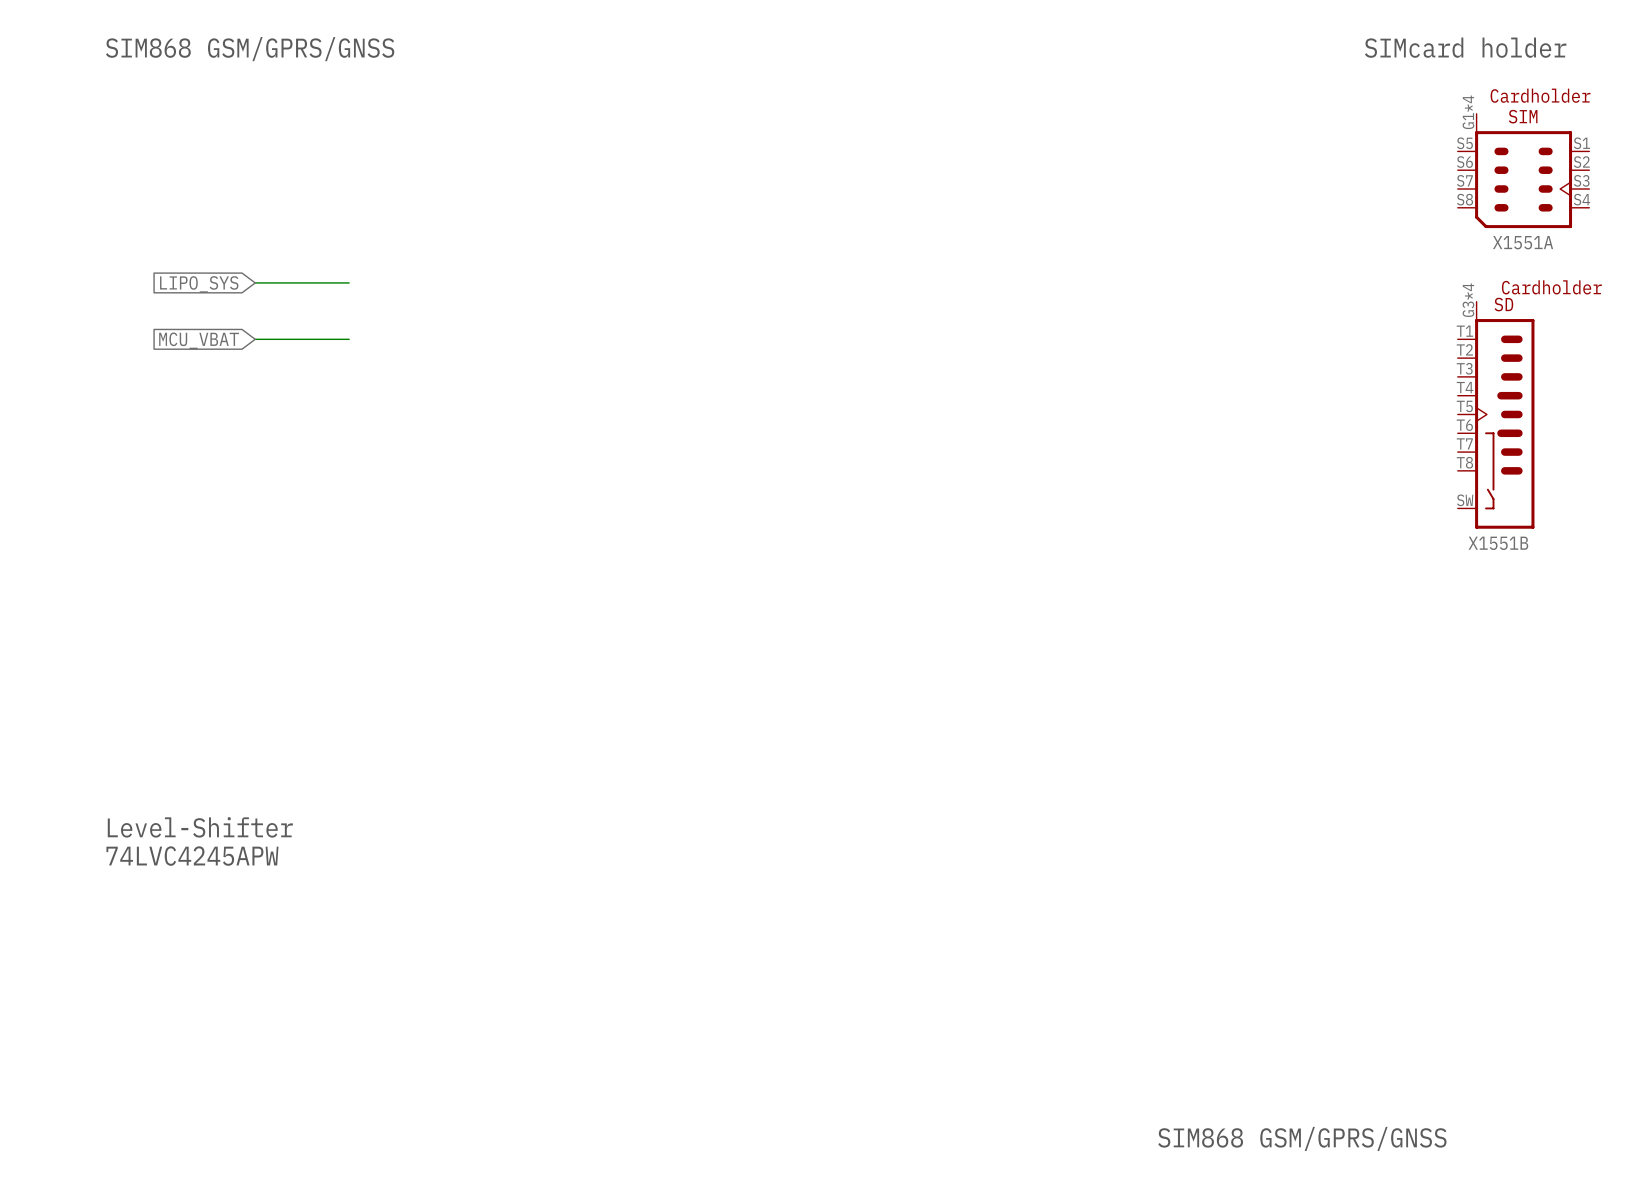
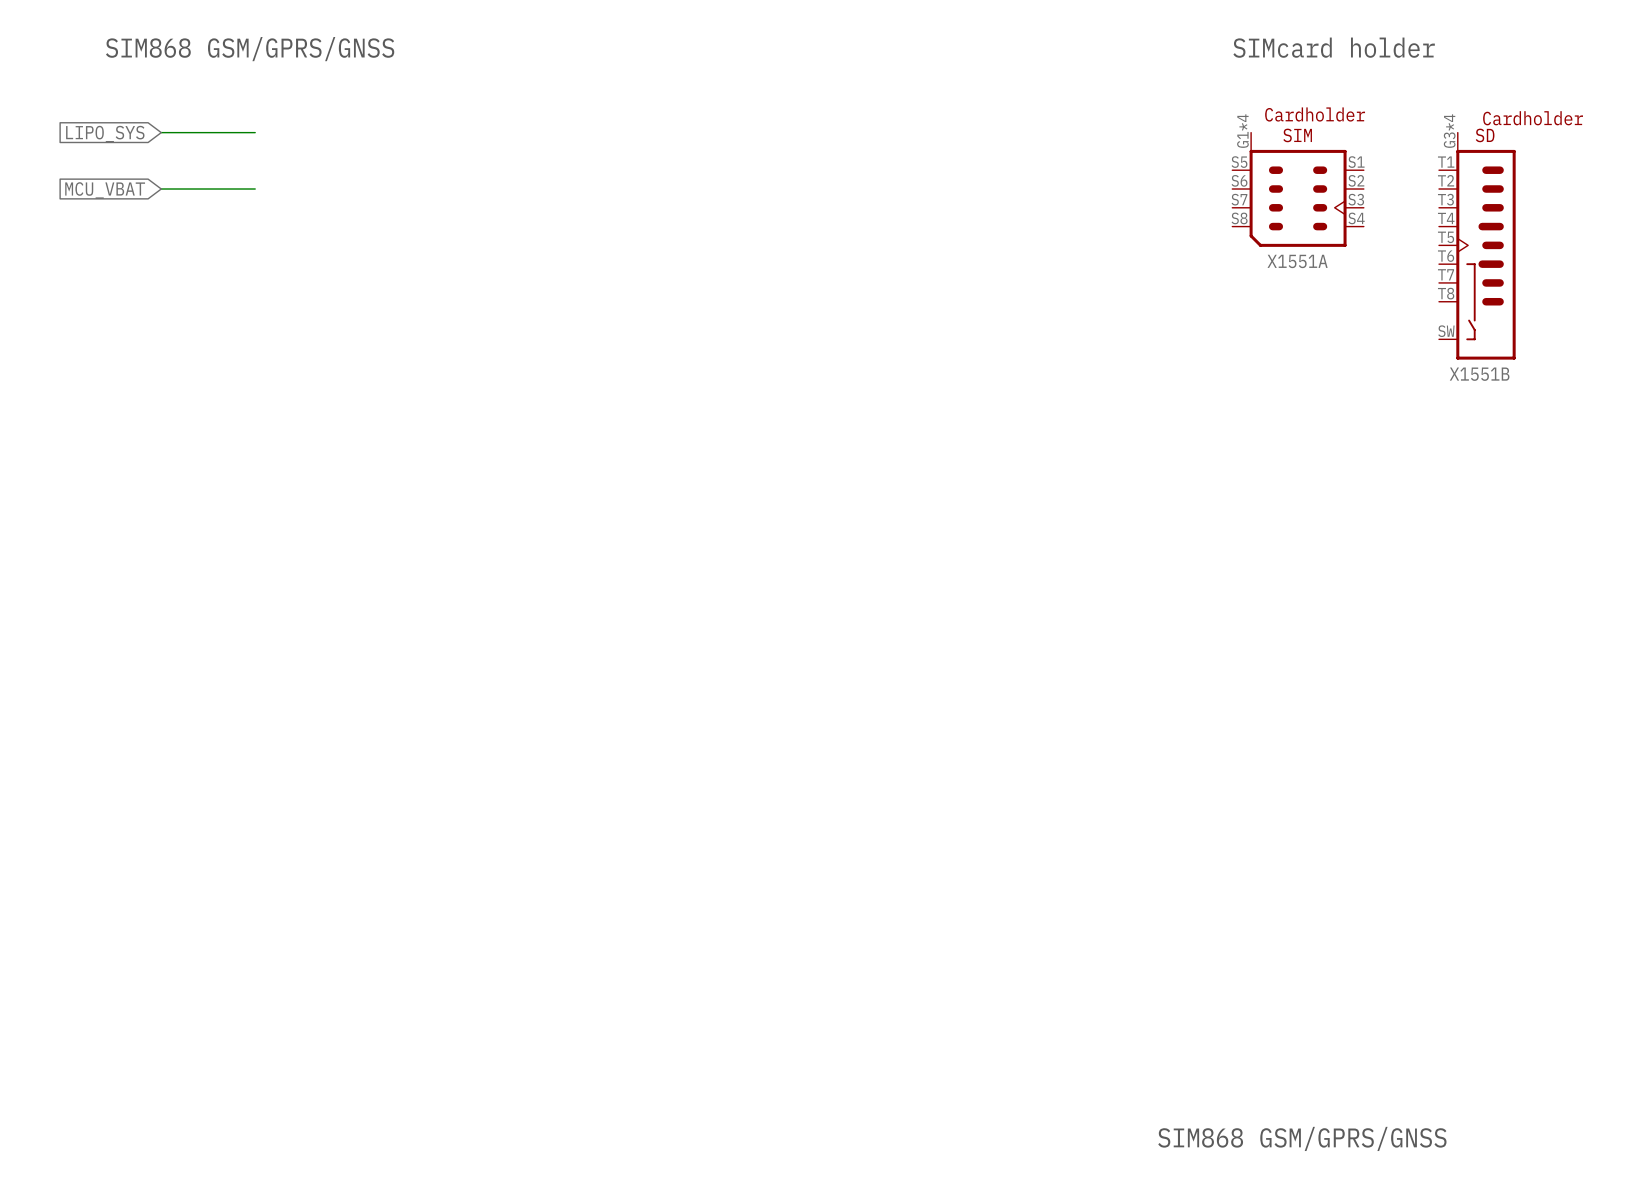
text position: SIMcard holder (1465, 47) -> SIMcard holder (1334, 47)
X1551A position: (1523, 170) -> (1298, 189)
wire: (255, 282) (349, 282) -> (161, 132) (255, 132)
global label position: LIPO_SYS (199, 284) -> LIPO_SYS (105, 134)
wire: (255, 339) (349, 339) -> (161, 189) (255, 189)
global label position: MCU_VBAT (199, 340) -> MCU_VBAT (105, 190)
X1551B position: (1496, 415) -> (1477, 246)
text: Level-Shifter (200, 827) -> none
text: 74LVC4245APW (192, 856) -> none

